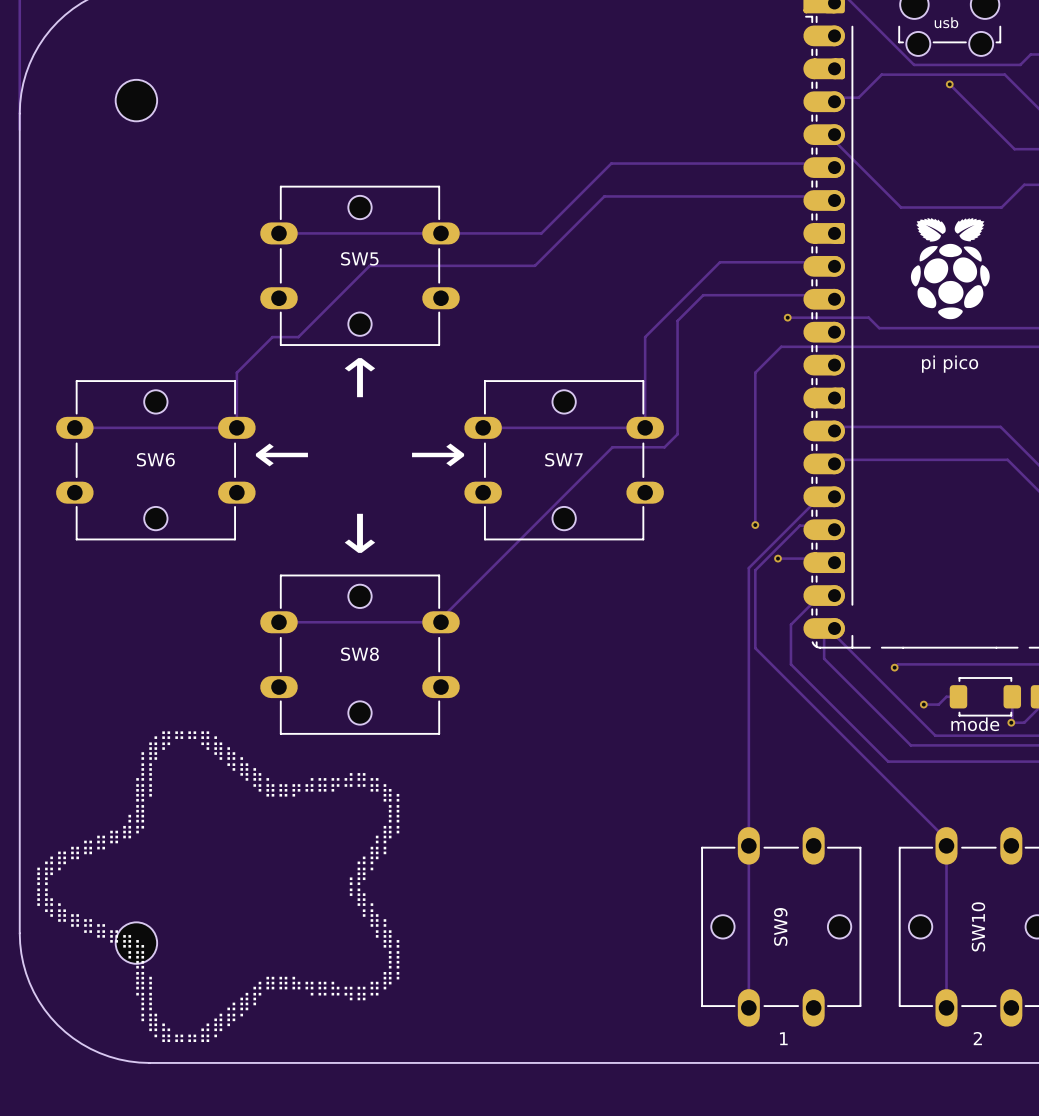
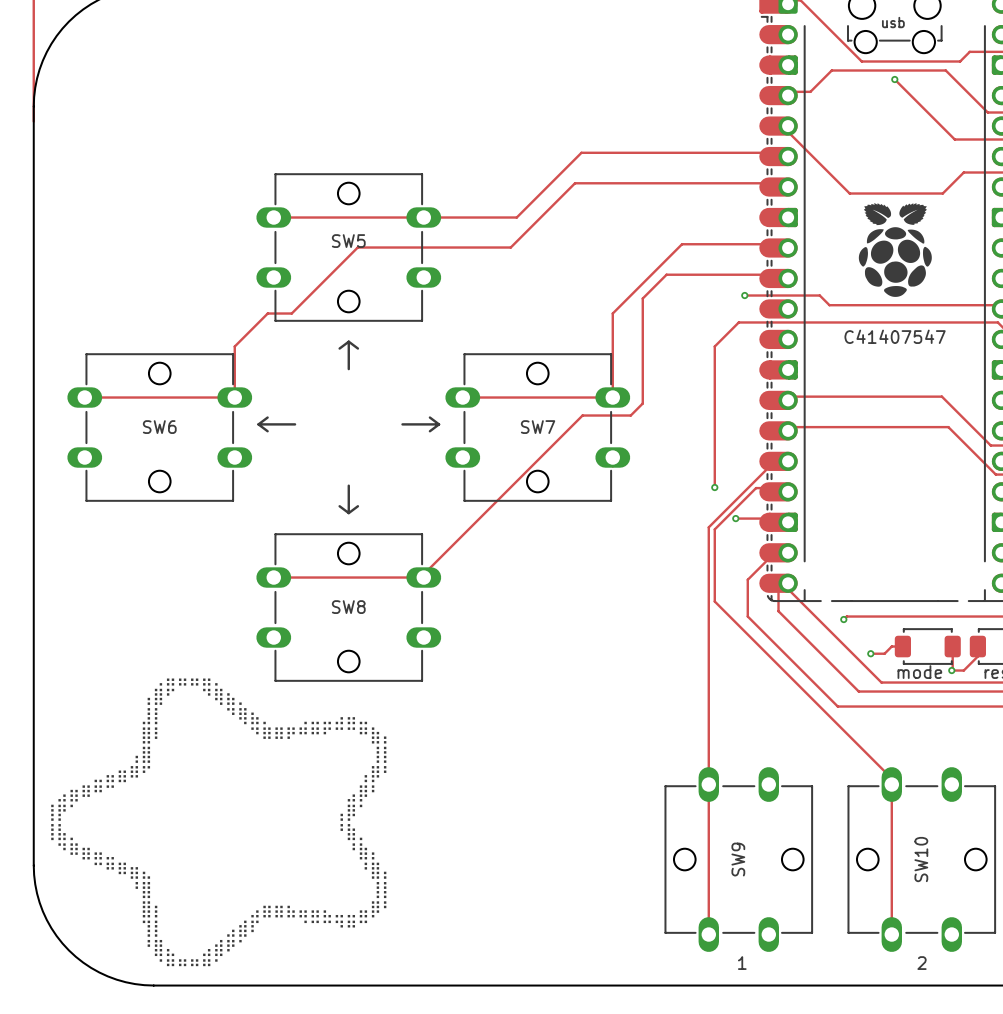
part: (136, 100) -> none
part text: pi pico (950, 364) -> C41407547 (895, 336)
part: (136, 943) -> none

